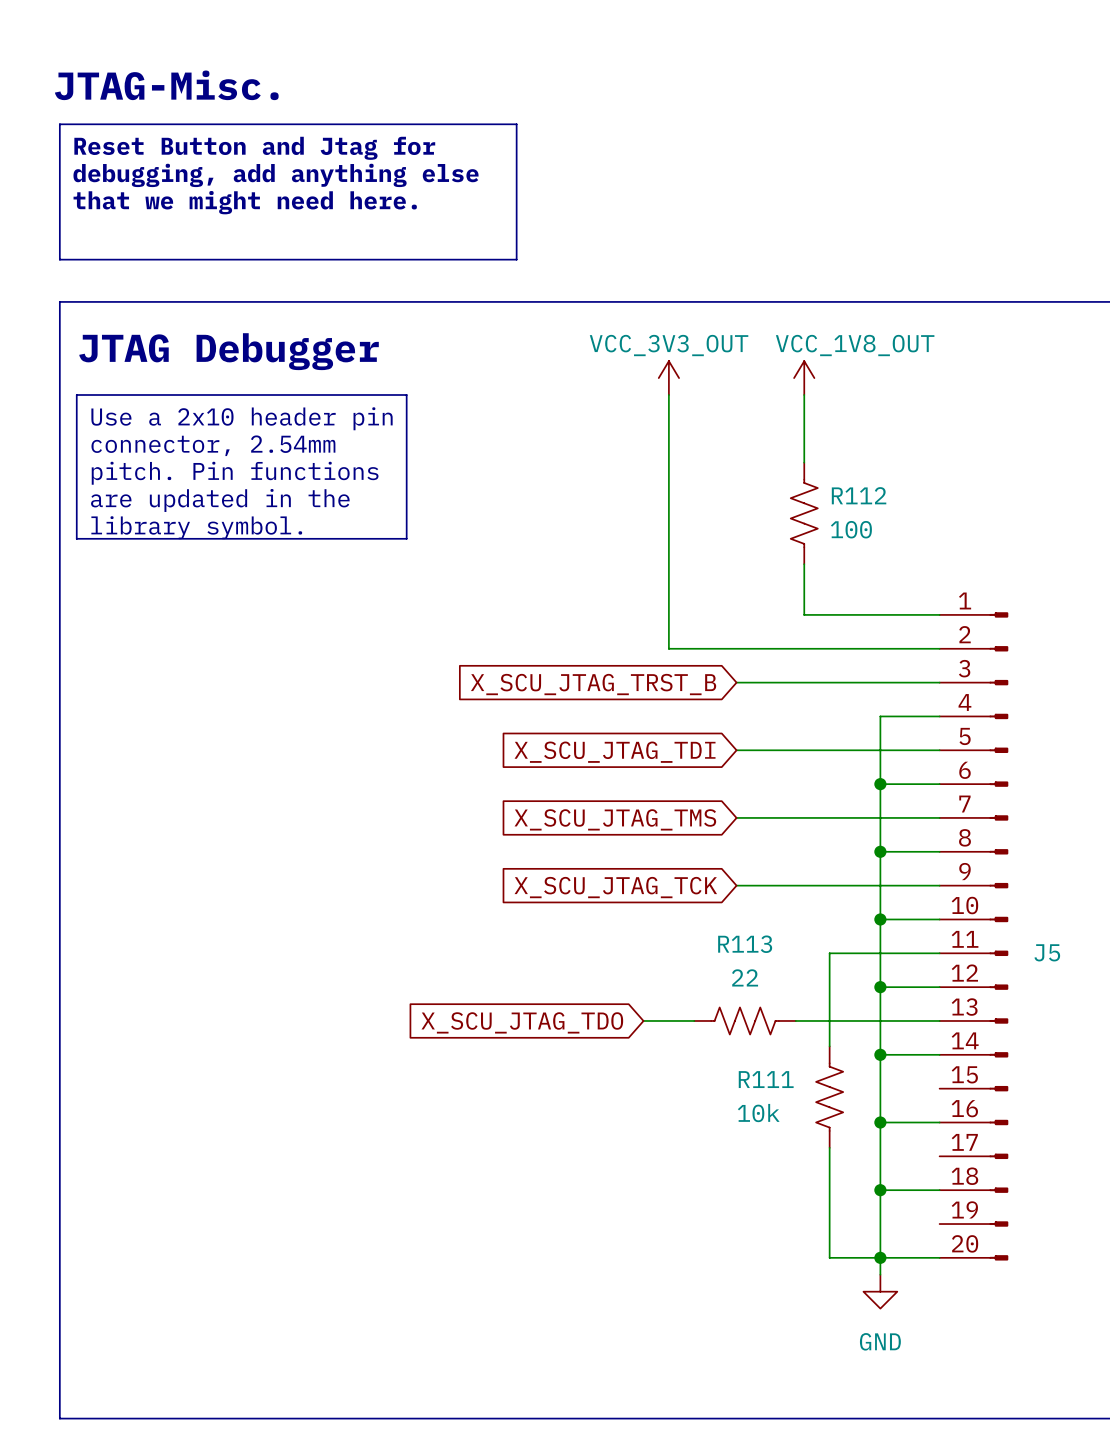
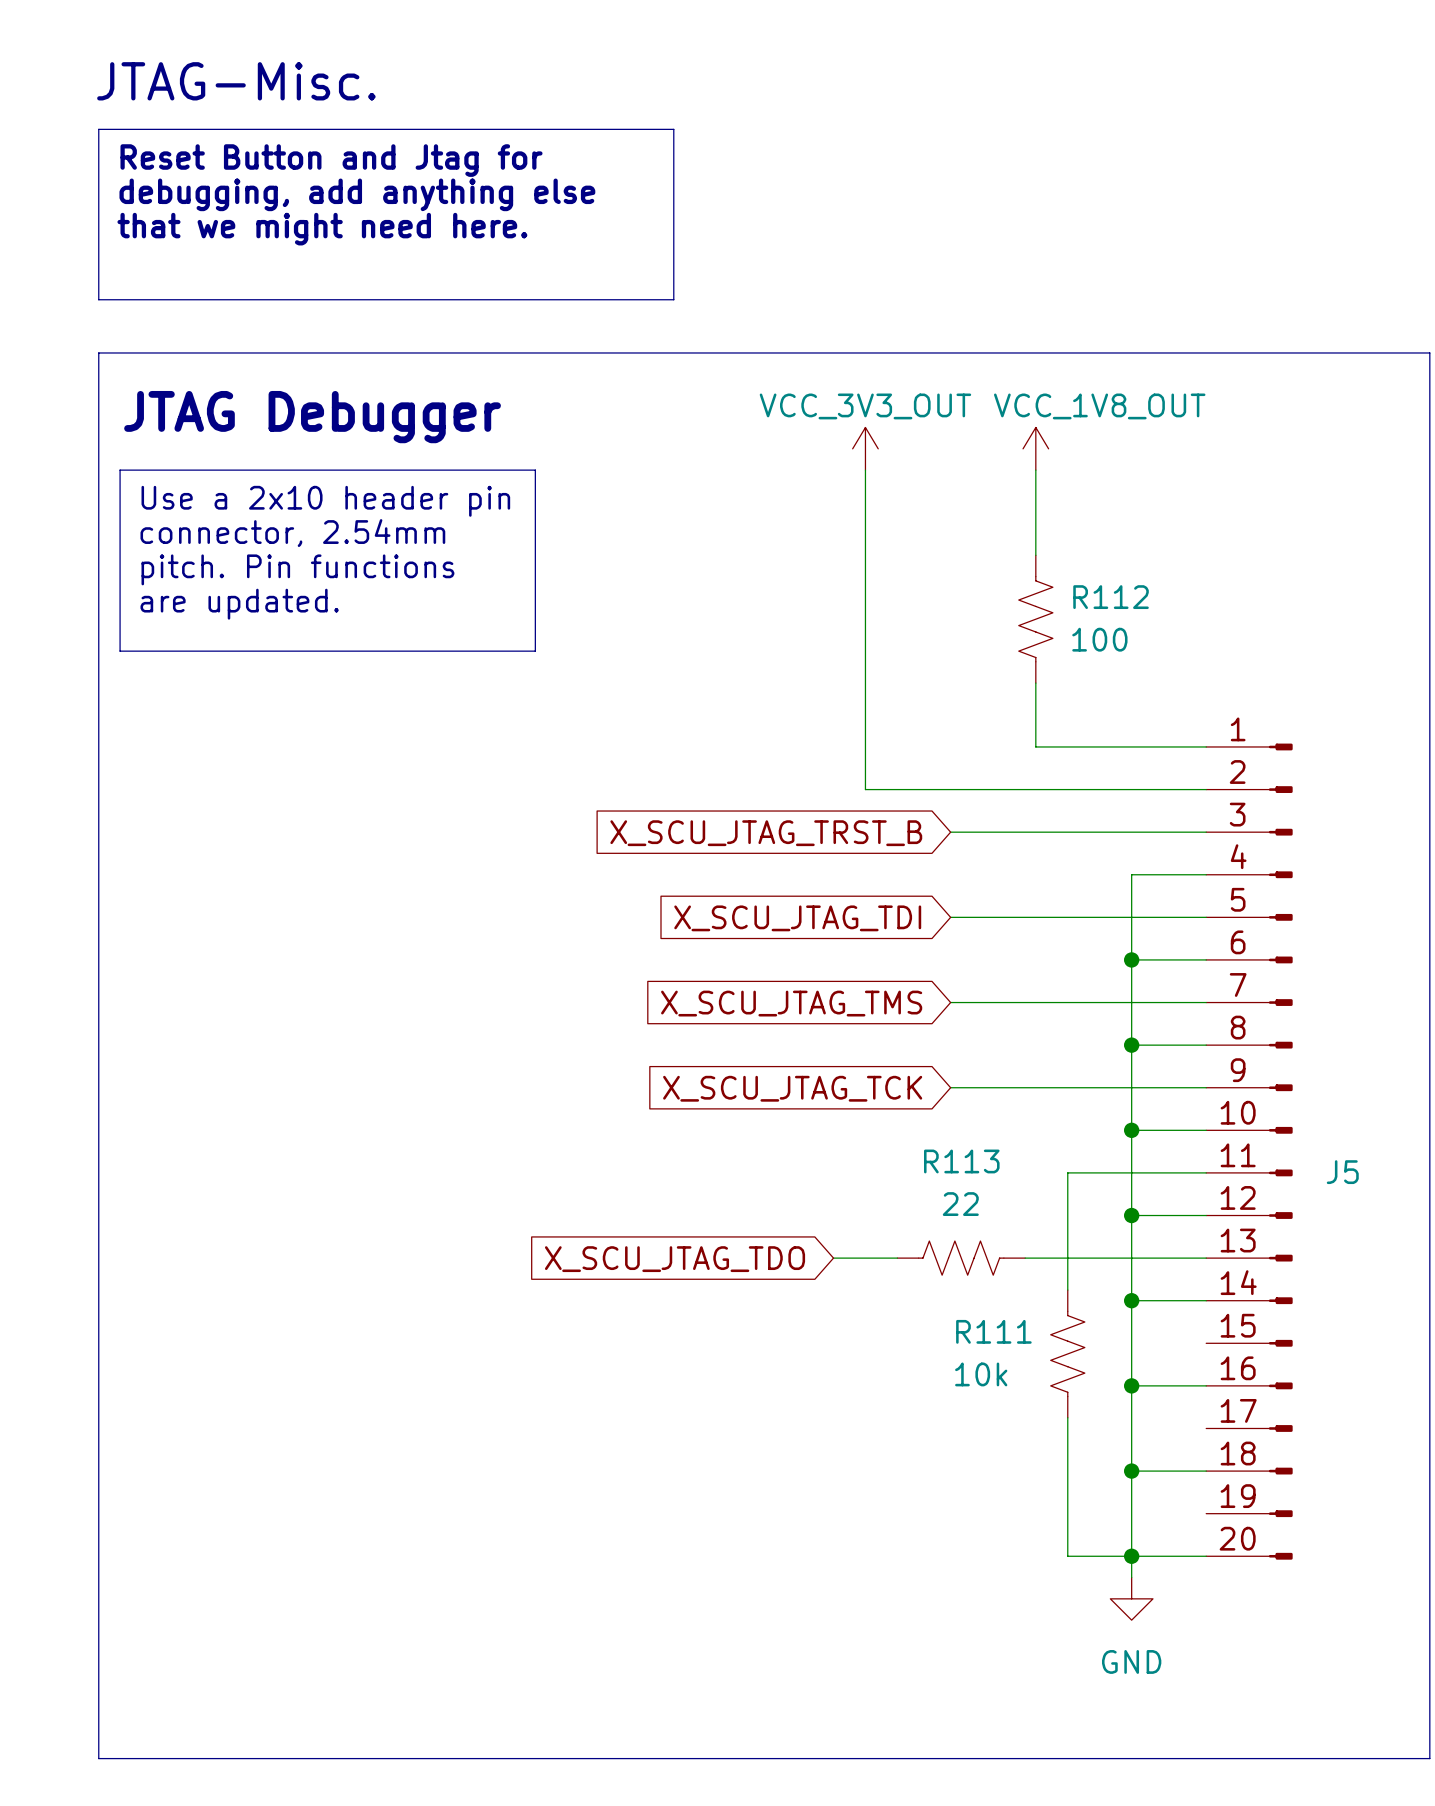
text: are updated in the (220, 500) -> are updated. (239, 604)
text: library symbol. (196, 527) -> none

